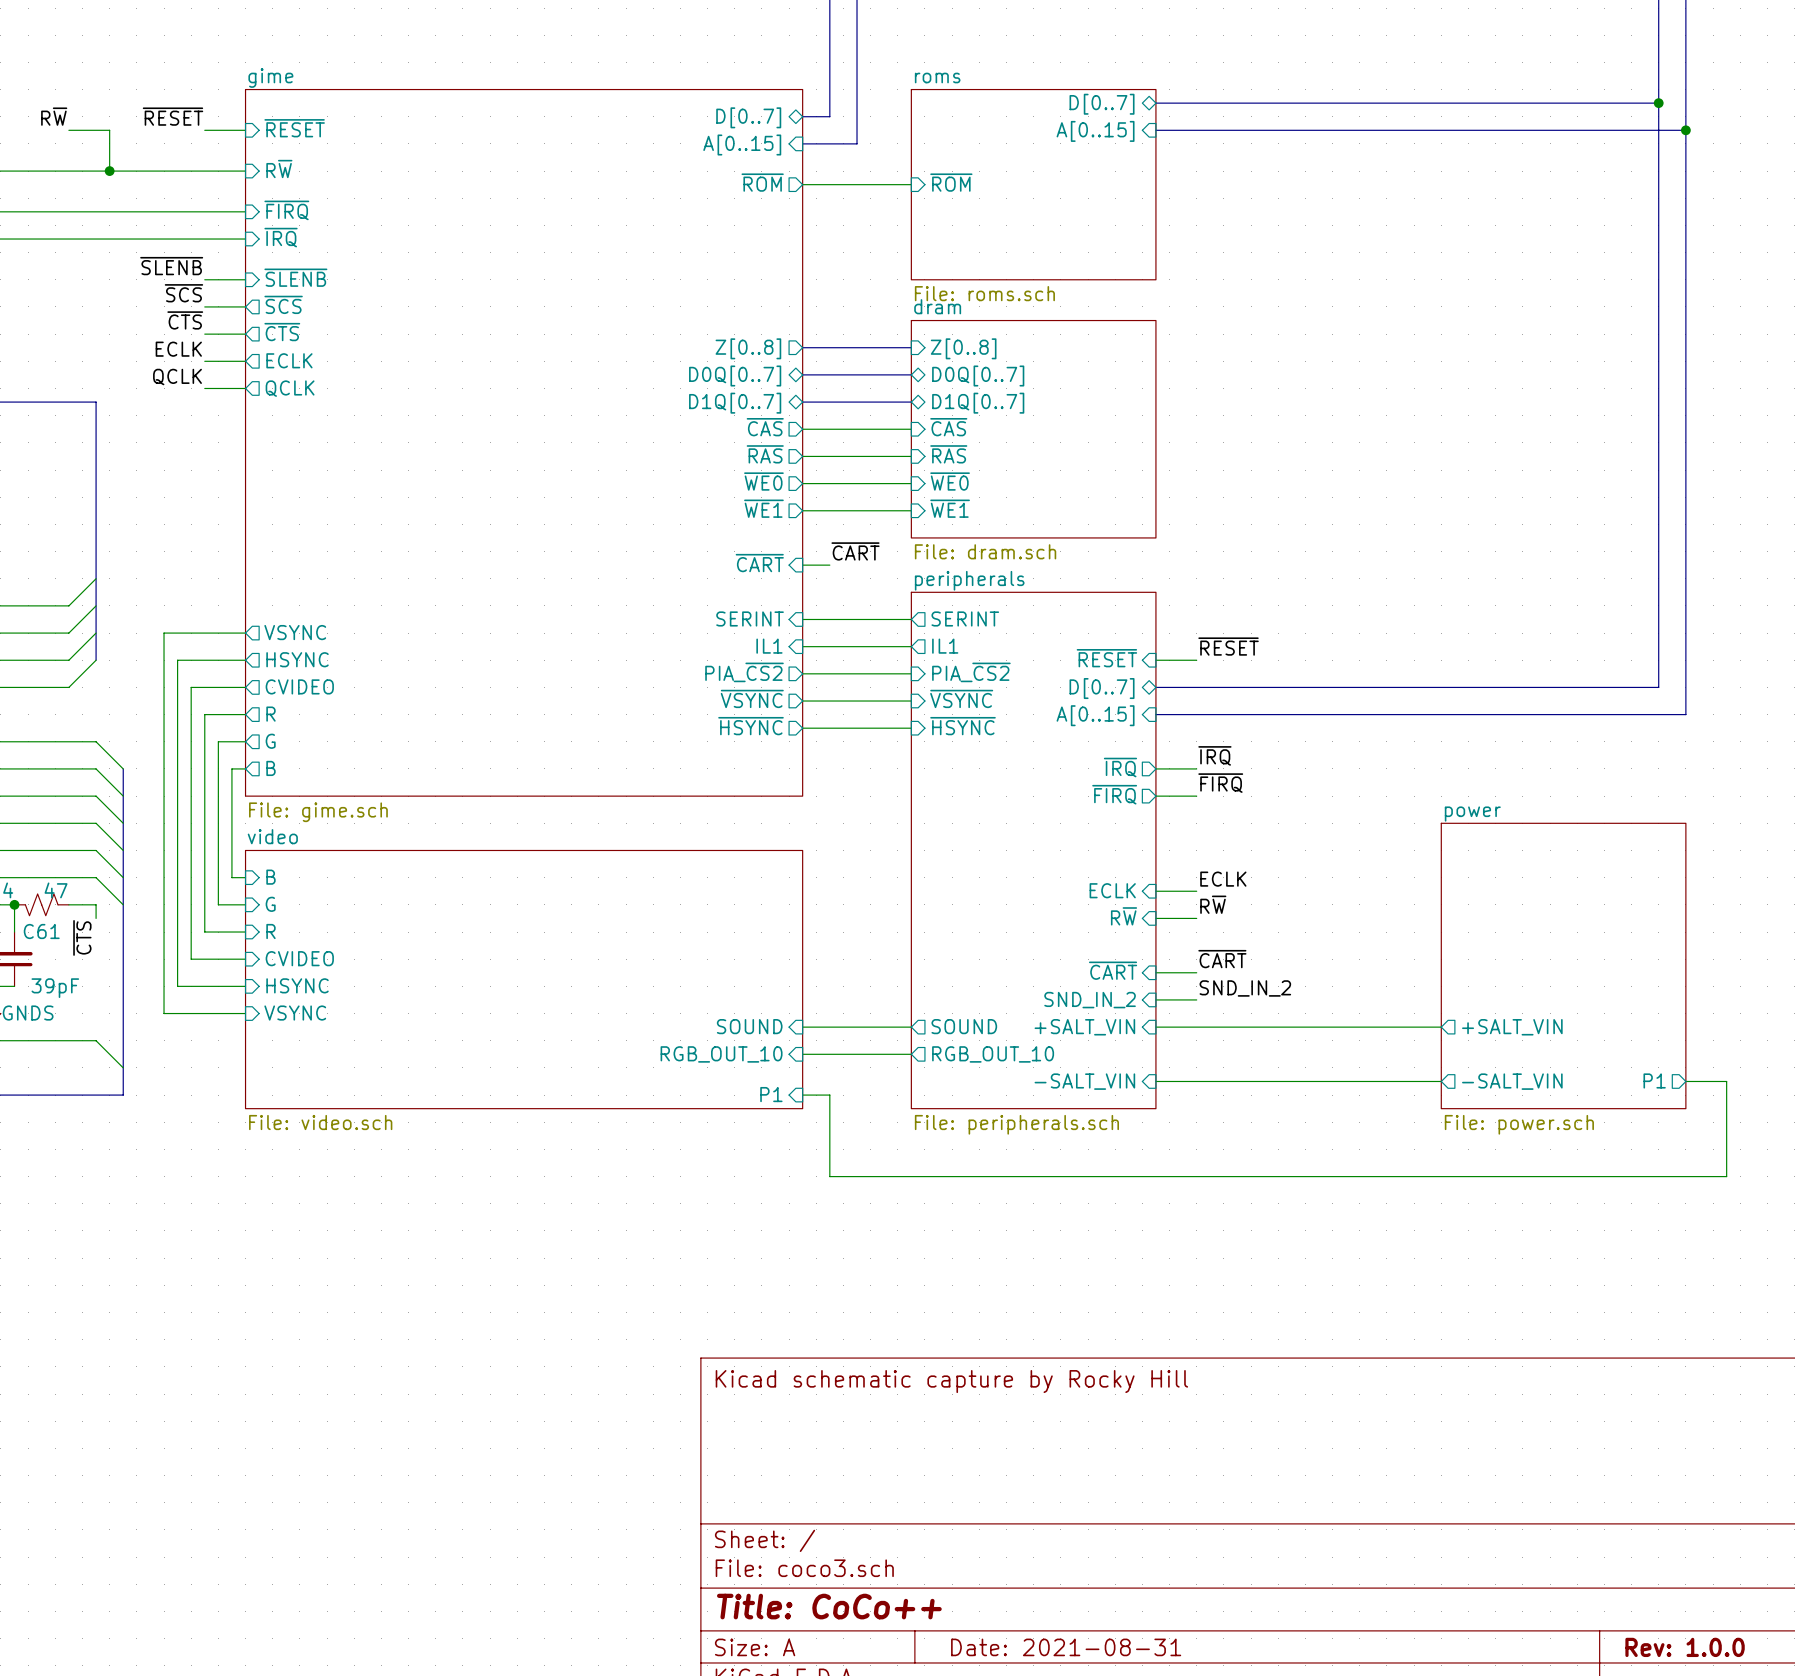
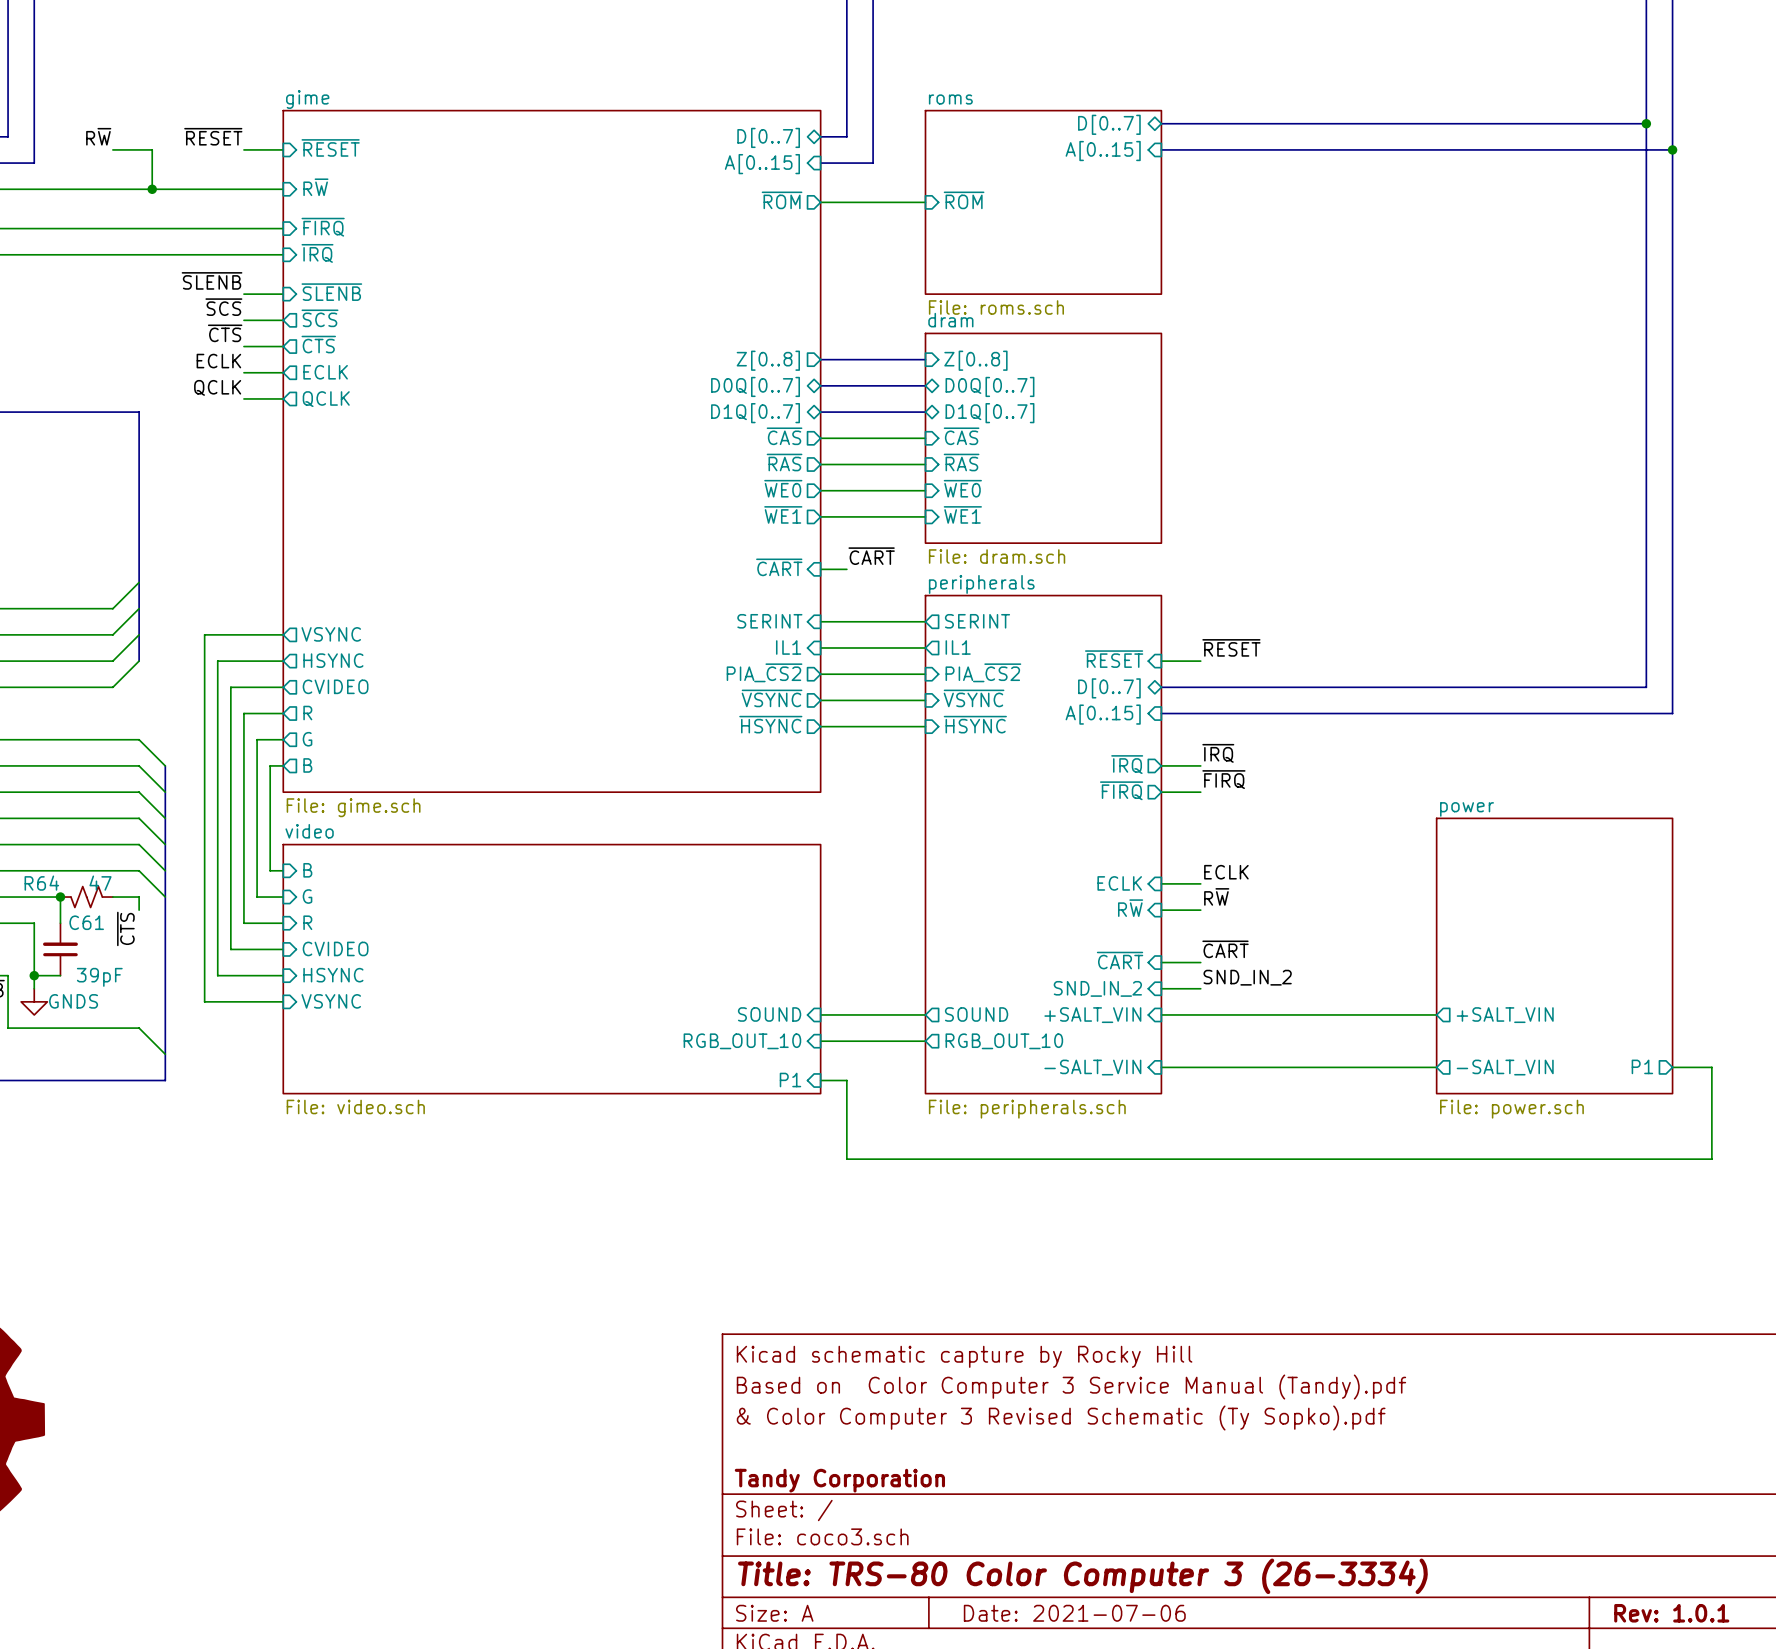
title block: none -> Based on Color Computer 3 Service Manual (Tandy).pdf (1071, 1387)
title block: none -> & Color Computer 3 Revised Schematic (Ty Sopko).pdf (1061, 1418)
title block: none -> Tandy Corporation (839, 1480)
title block: Title: CoCo++ (829, 1606) -> Title: TRS-80 Color Computer 3 (26-3334) (1082, 1576)
title block: Date: 2021-08-31 (1066, 1647) -> Date: 2021-07-06 (1074, 1613)
title block: Rev: 1.0.0 (1685, 1647) -> Rev: 1.0.1 (1671, 1613)

